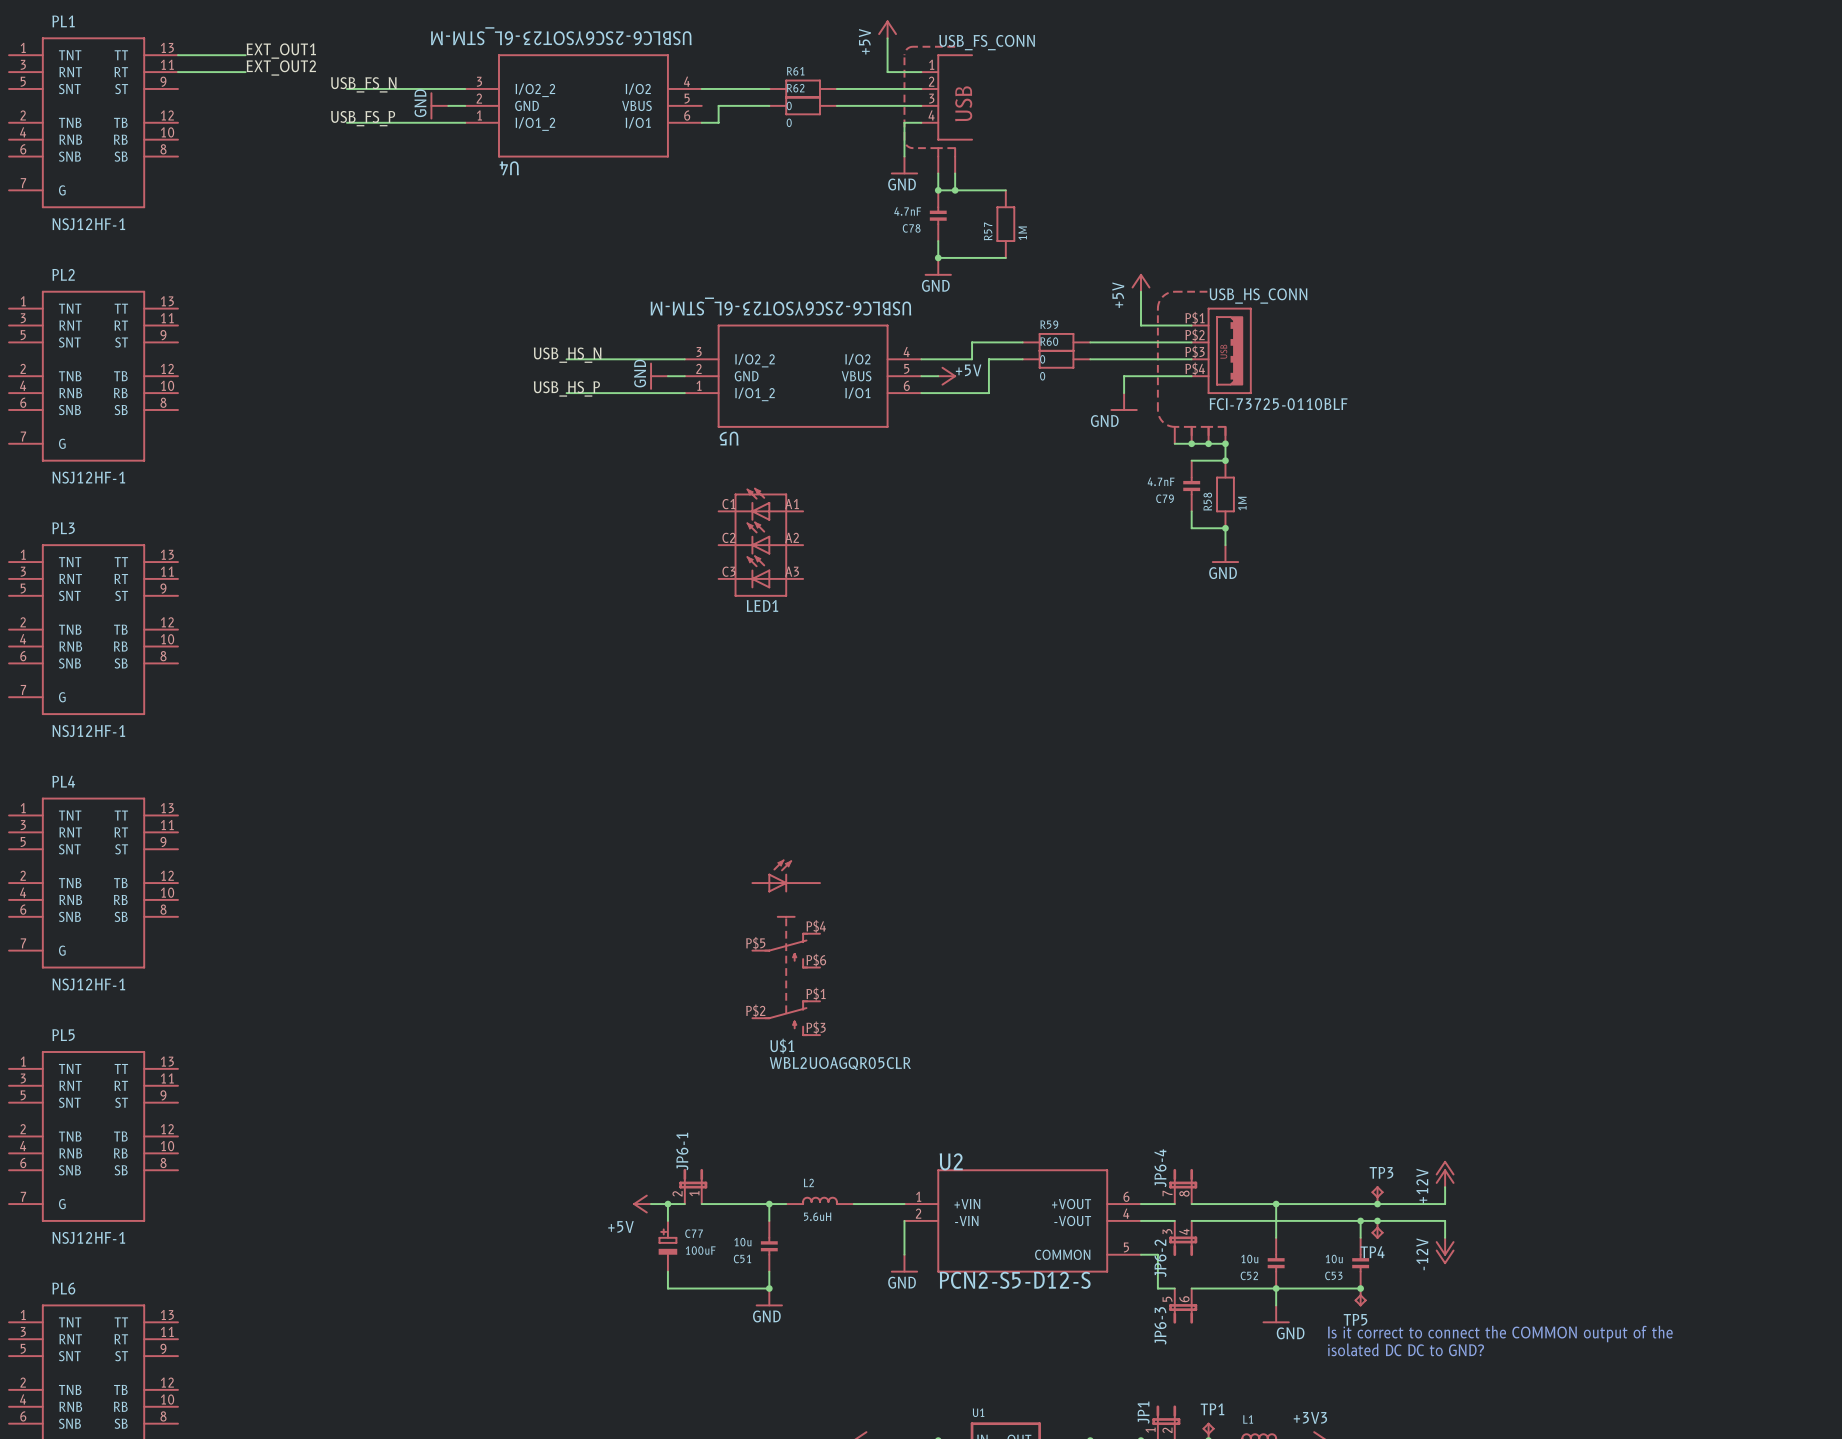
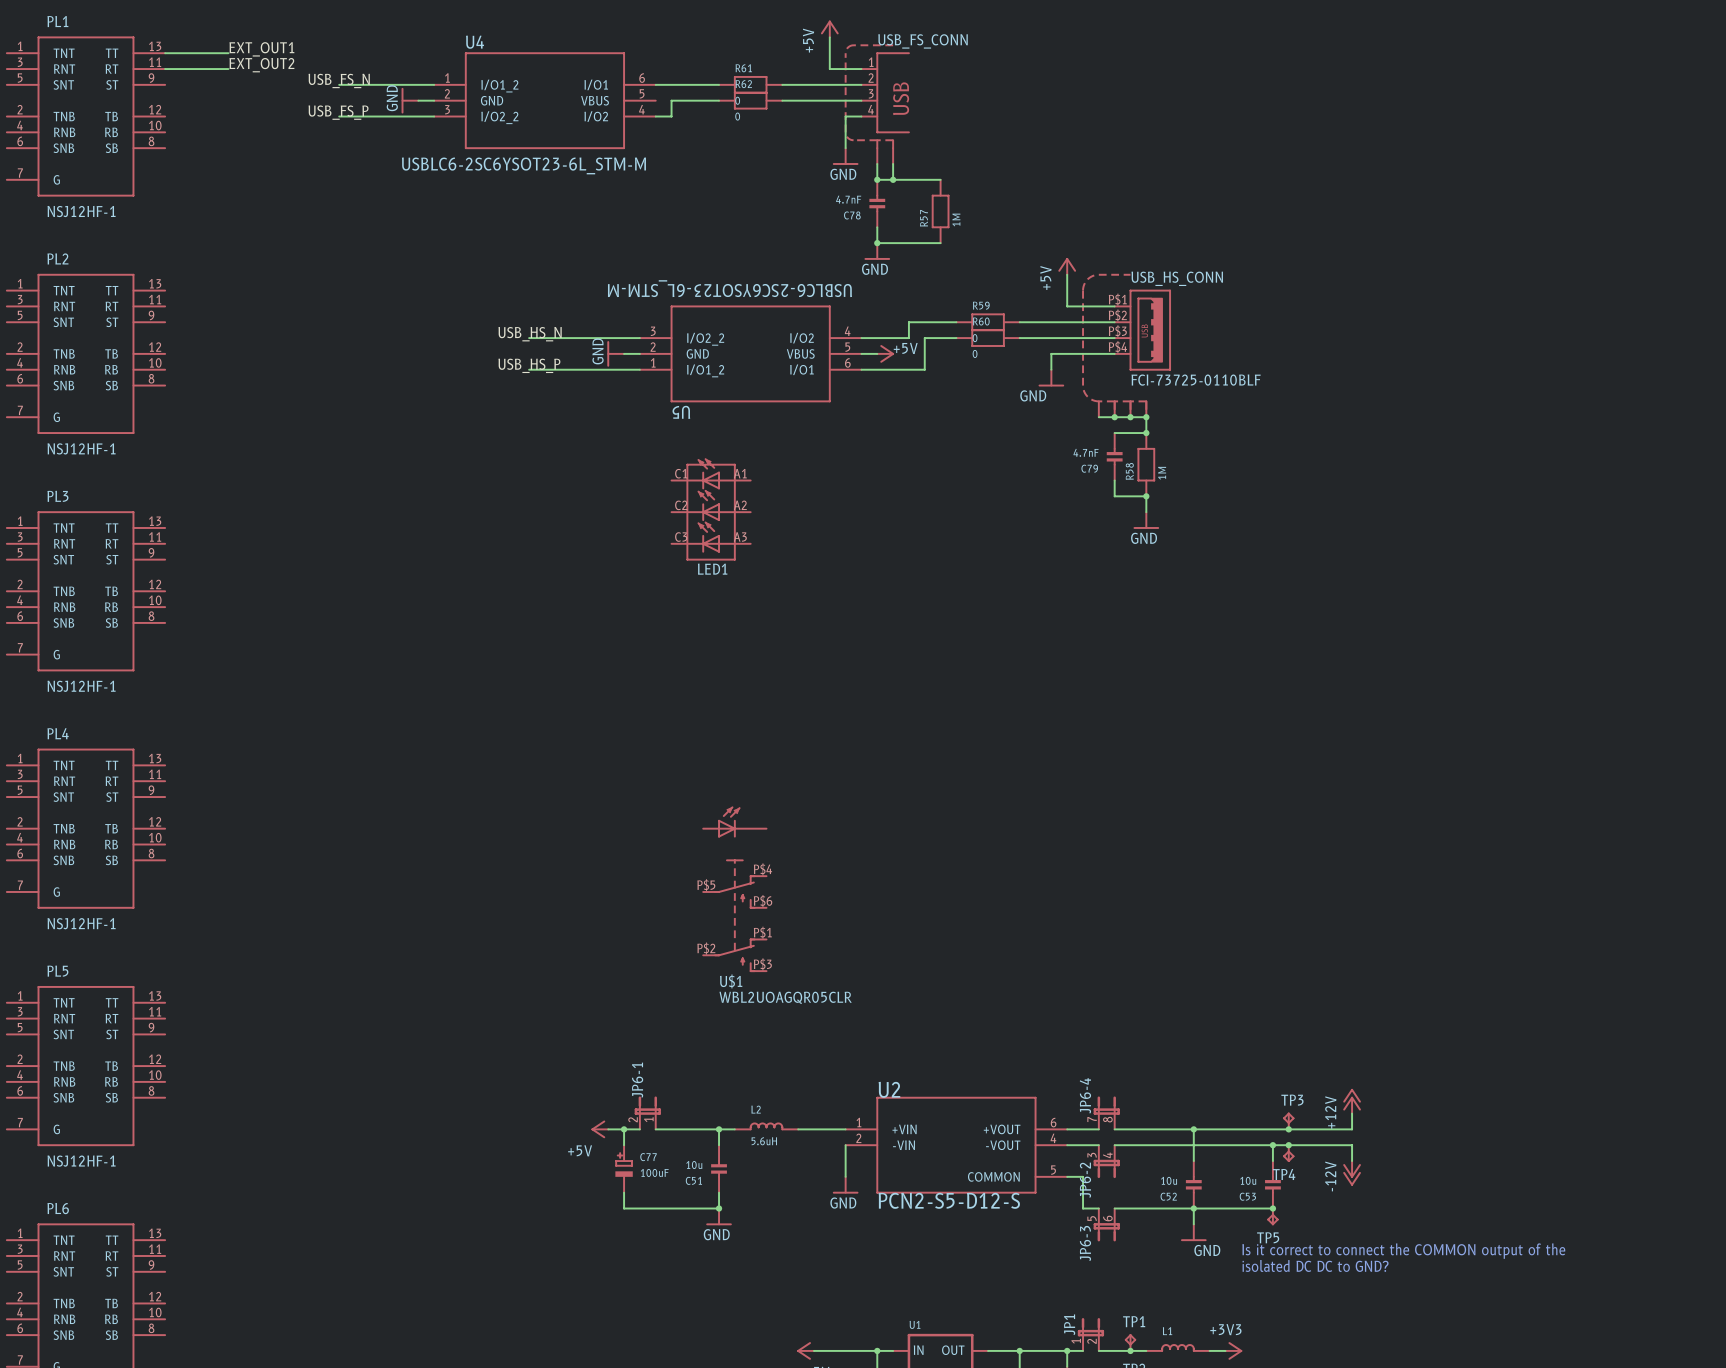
wire: (346, 88) (363, 88) -> none
U4 flip: as is (583, 105) -> up-down (544, 100)
wire: (346, 122) (363, 122) -> none

